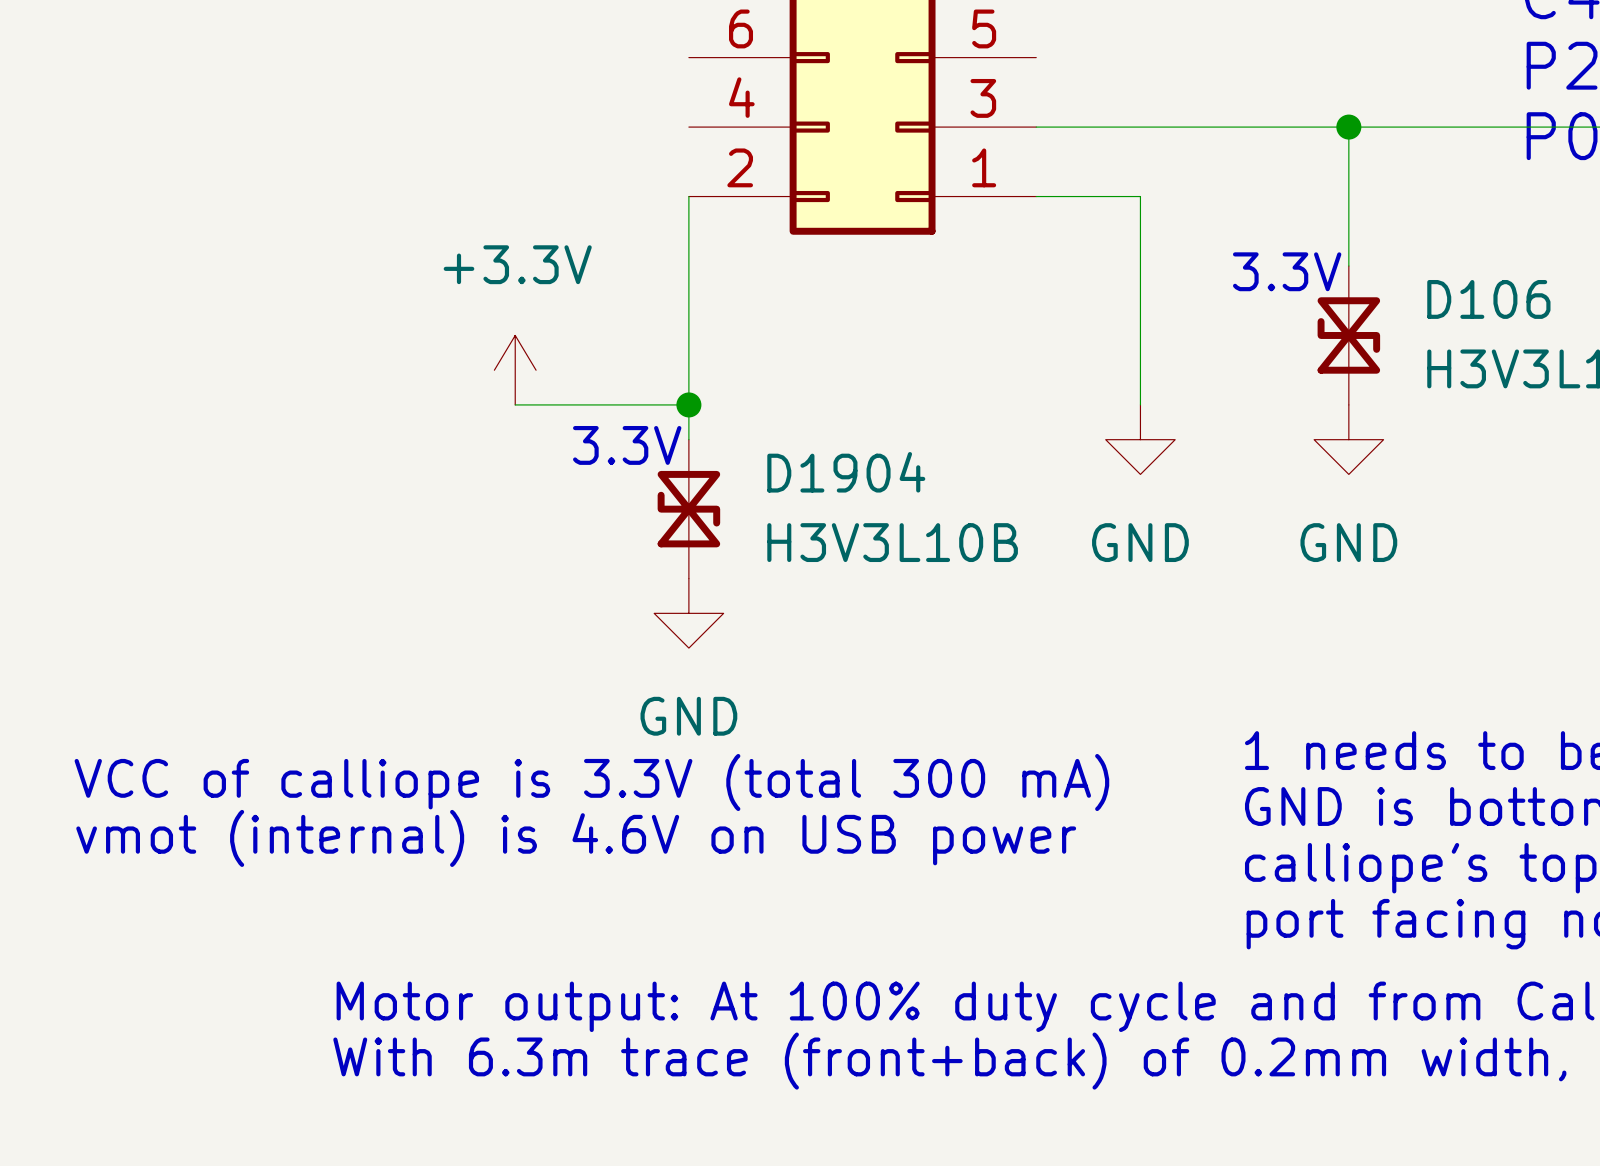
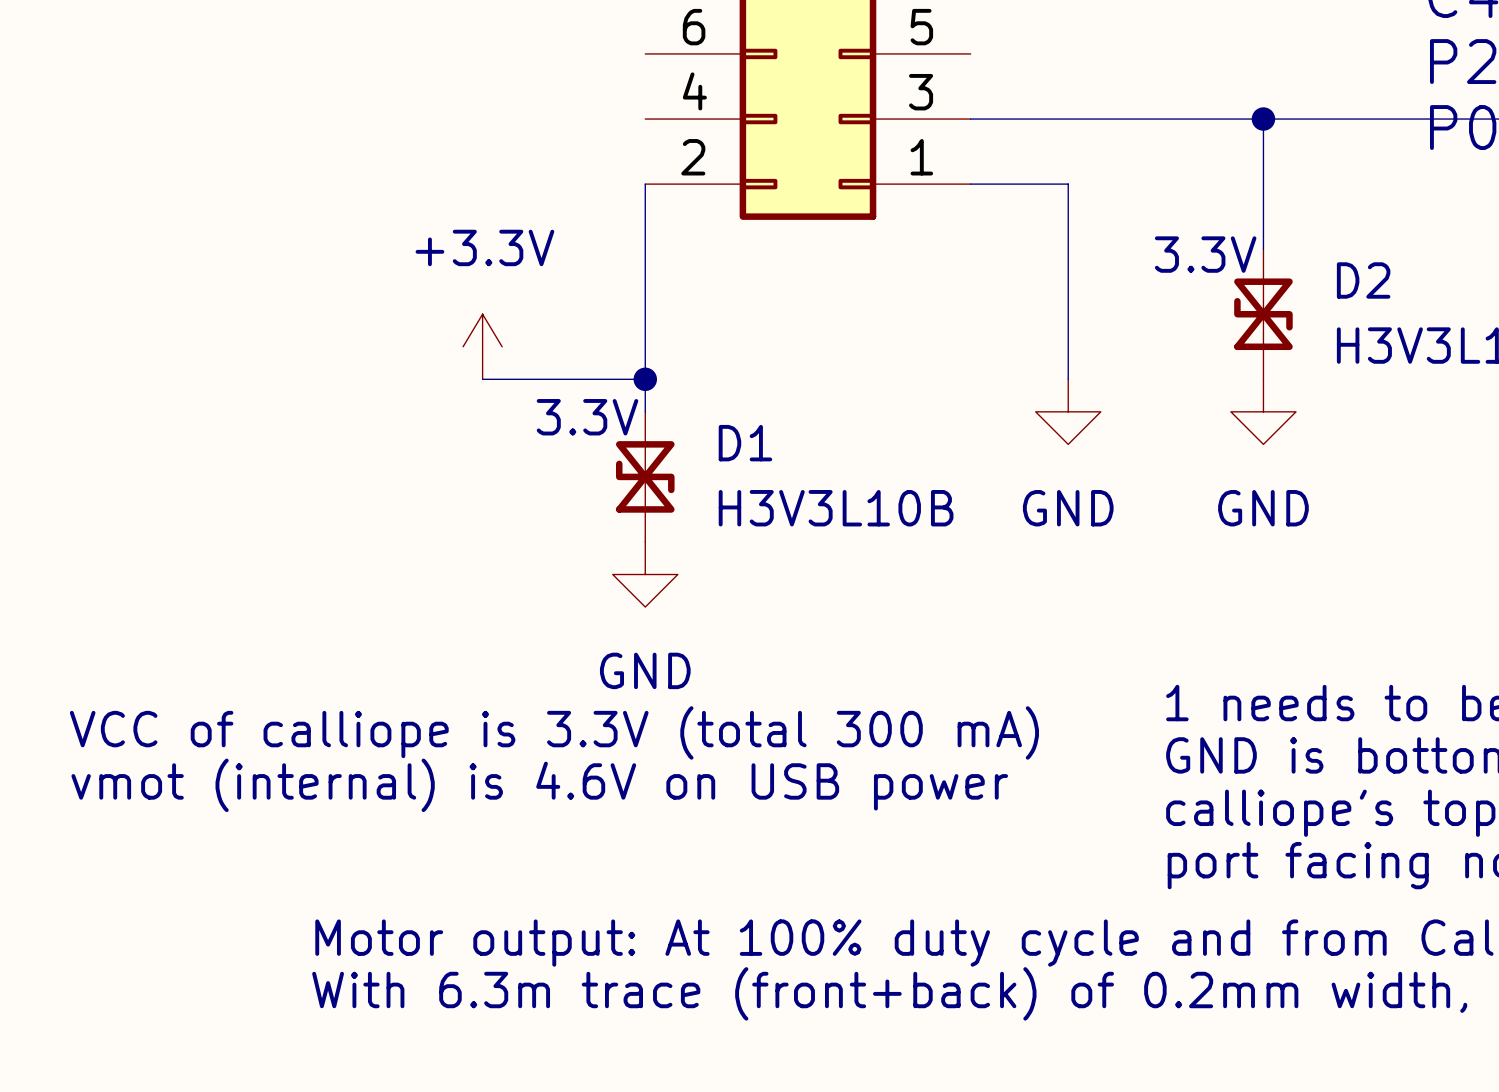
D106 name: D106 (1488, 299) -> D2 (1363, 280)
D1904 name: D1904 (846, 472) -> D1 (745, 443)

